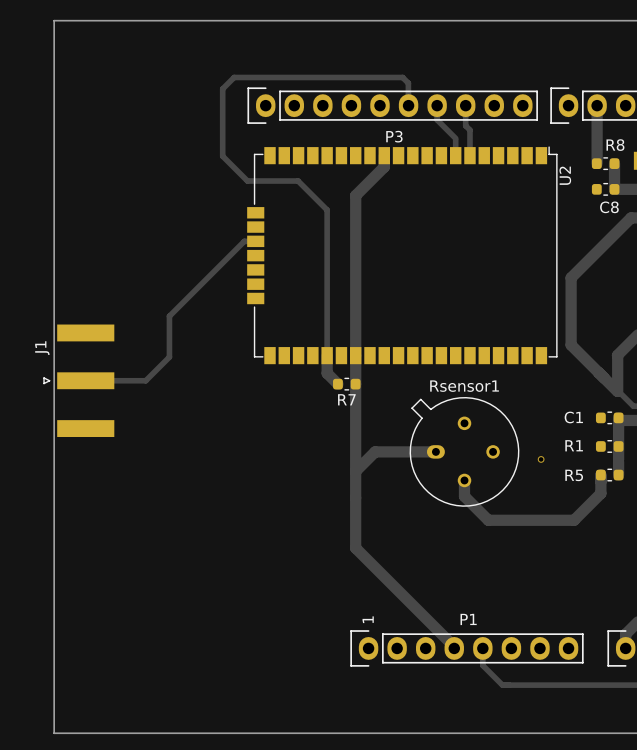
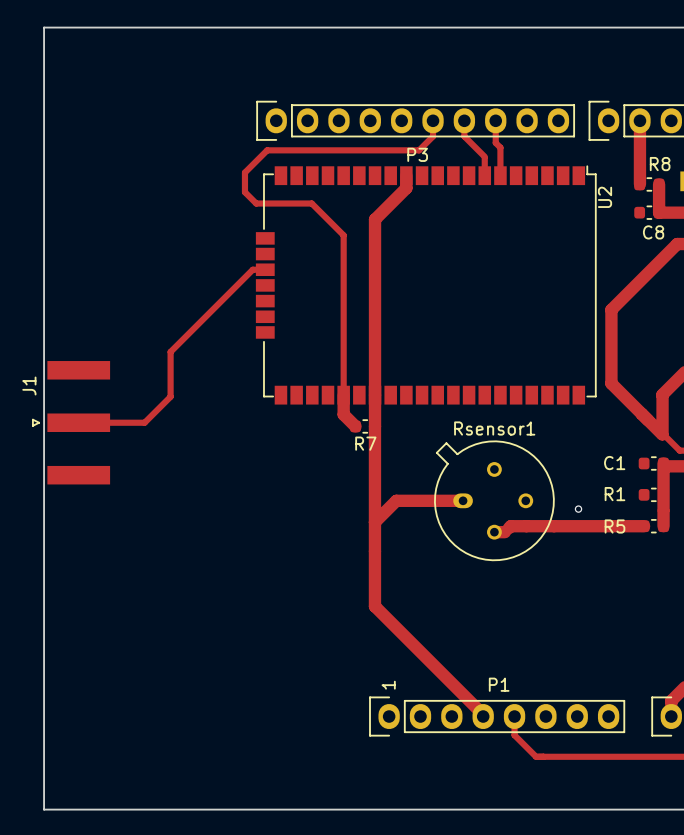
track: (408, 105) (408, 83) (402, 77) (234, 77) (222, 88) (222, 156) (247, 181) -> (433, 120) (433, 136) (419, 150) (267, 150) (244, 172) (244, 192) (256, 203)
track: (600, 475) (600, 493) (574, 520) (488, 520) (464, 496) (464, 480) -> (644, 526) (510, 526) (504, 532) (494, 532)

